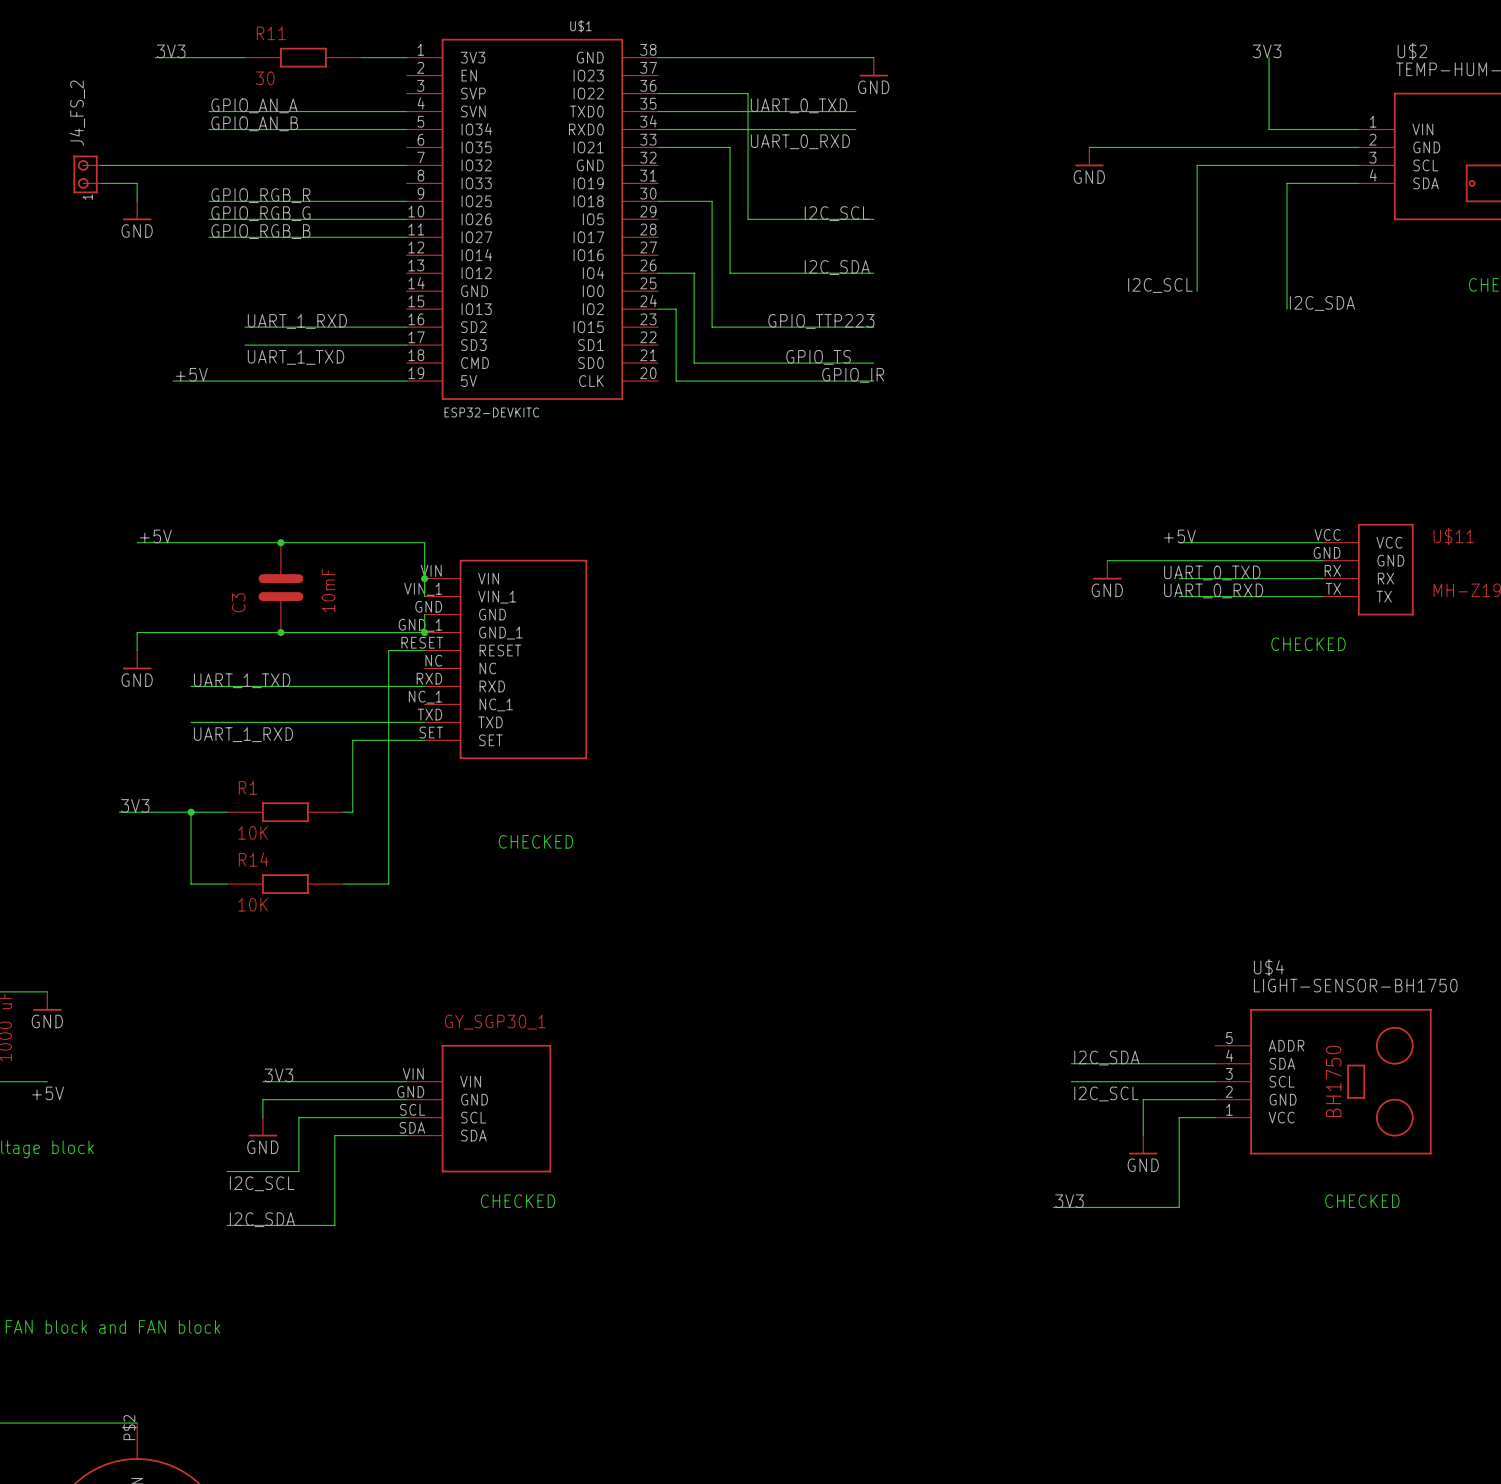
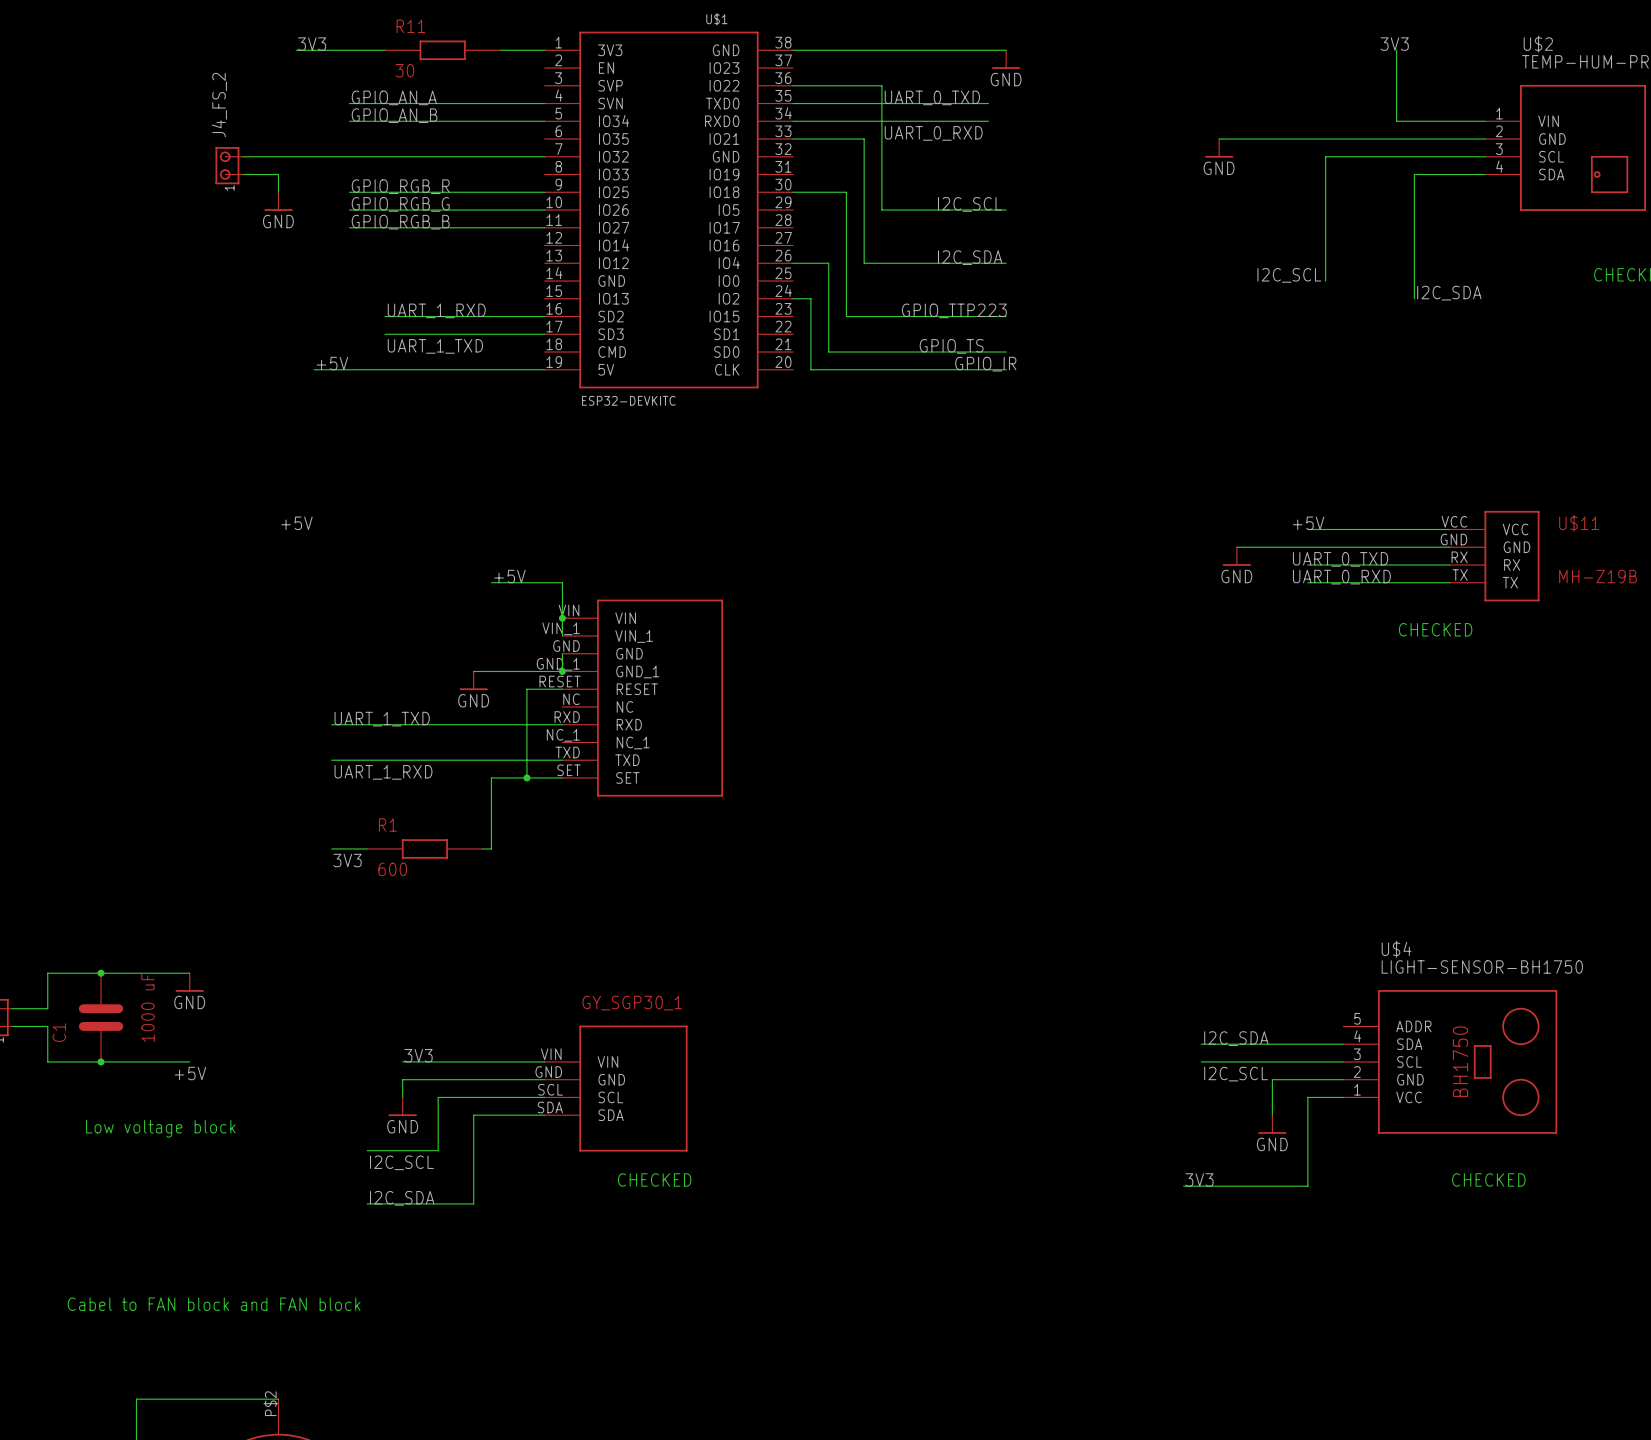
wire: (137, 542) (424, 542) (424, 596) -> none
junction: (280, 542) -> none
junction: (424, 578) -> none
C3: 10mF (280, 587) -> none
label: none -> +5V (509, 576)
wire: none -> (491, 582) (562, 582) (562, 600)
junction: (280, 632) -> none
wire: (424, 632) (137, 632) (137, 650) -> (562, 618) (562, 635)
wire: (424, 650) (388, 650) (388, 704) -> (562, 689) (526, 689)
power symbol: GND (137, 659) -> none
part position: (505, 659) -> (642, 698)
wire: none -> (562, 653) (562, 671)
label: UART_1_TXD (242, 680) -> none
wire: (191, 686) (334, 686) -> none
junction: none -> (562, 671)
power symbol: none -> GND (473, 680)
wire: (191, 722) (424, 722) -> (331, 760) (562, 760)
label: UART_1_RXD (243, 734) -> UART_1_TXD (382, 719)
wire: none -> (331, 724) (491, 724)
wire: (352, 740) (352, 794) -> (562, 777) (491, 777)
label: none -> UART_1_RXD (383, 772)
wire: (388, 794) (388, 884) (343, 884) -> none
junction: none -> (526, 777)
label position: 3V3 (135, 805) -> 3V3 (347, 860)
wire: (119, 812) (227, 812) -> none
wire: (191, 812) (191, 884) (227, 884) -> none
junction: (191, 812) -> none
R1 position: (285, 812) -> (424, 848)
wire: (343, 812) (352, 812) -> (482, 848) (491, 848) (491, 795)
R1 value: 10K (253, 832) -> 600 (392, 869)
text: CHECKED (535, 841) -> none
wire: none -> (331, 848) (367, 848)
R14: 10K (285, 884) -> none

